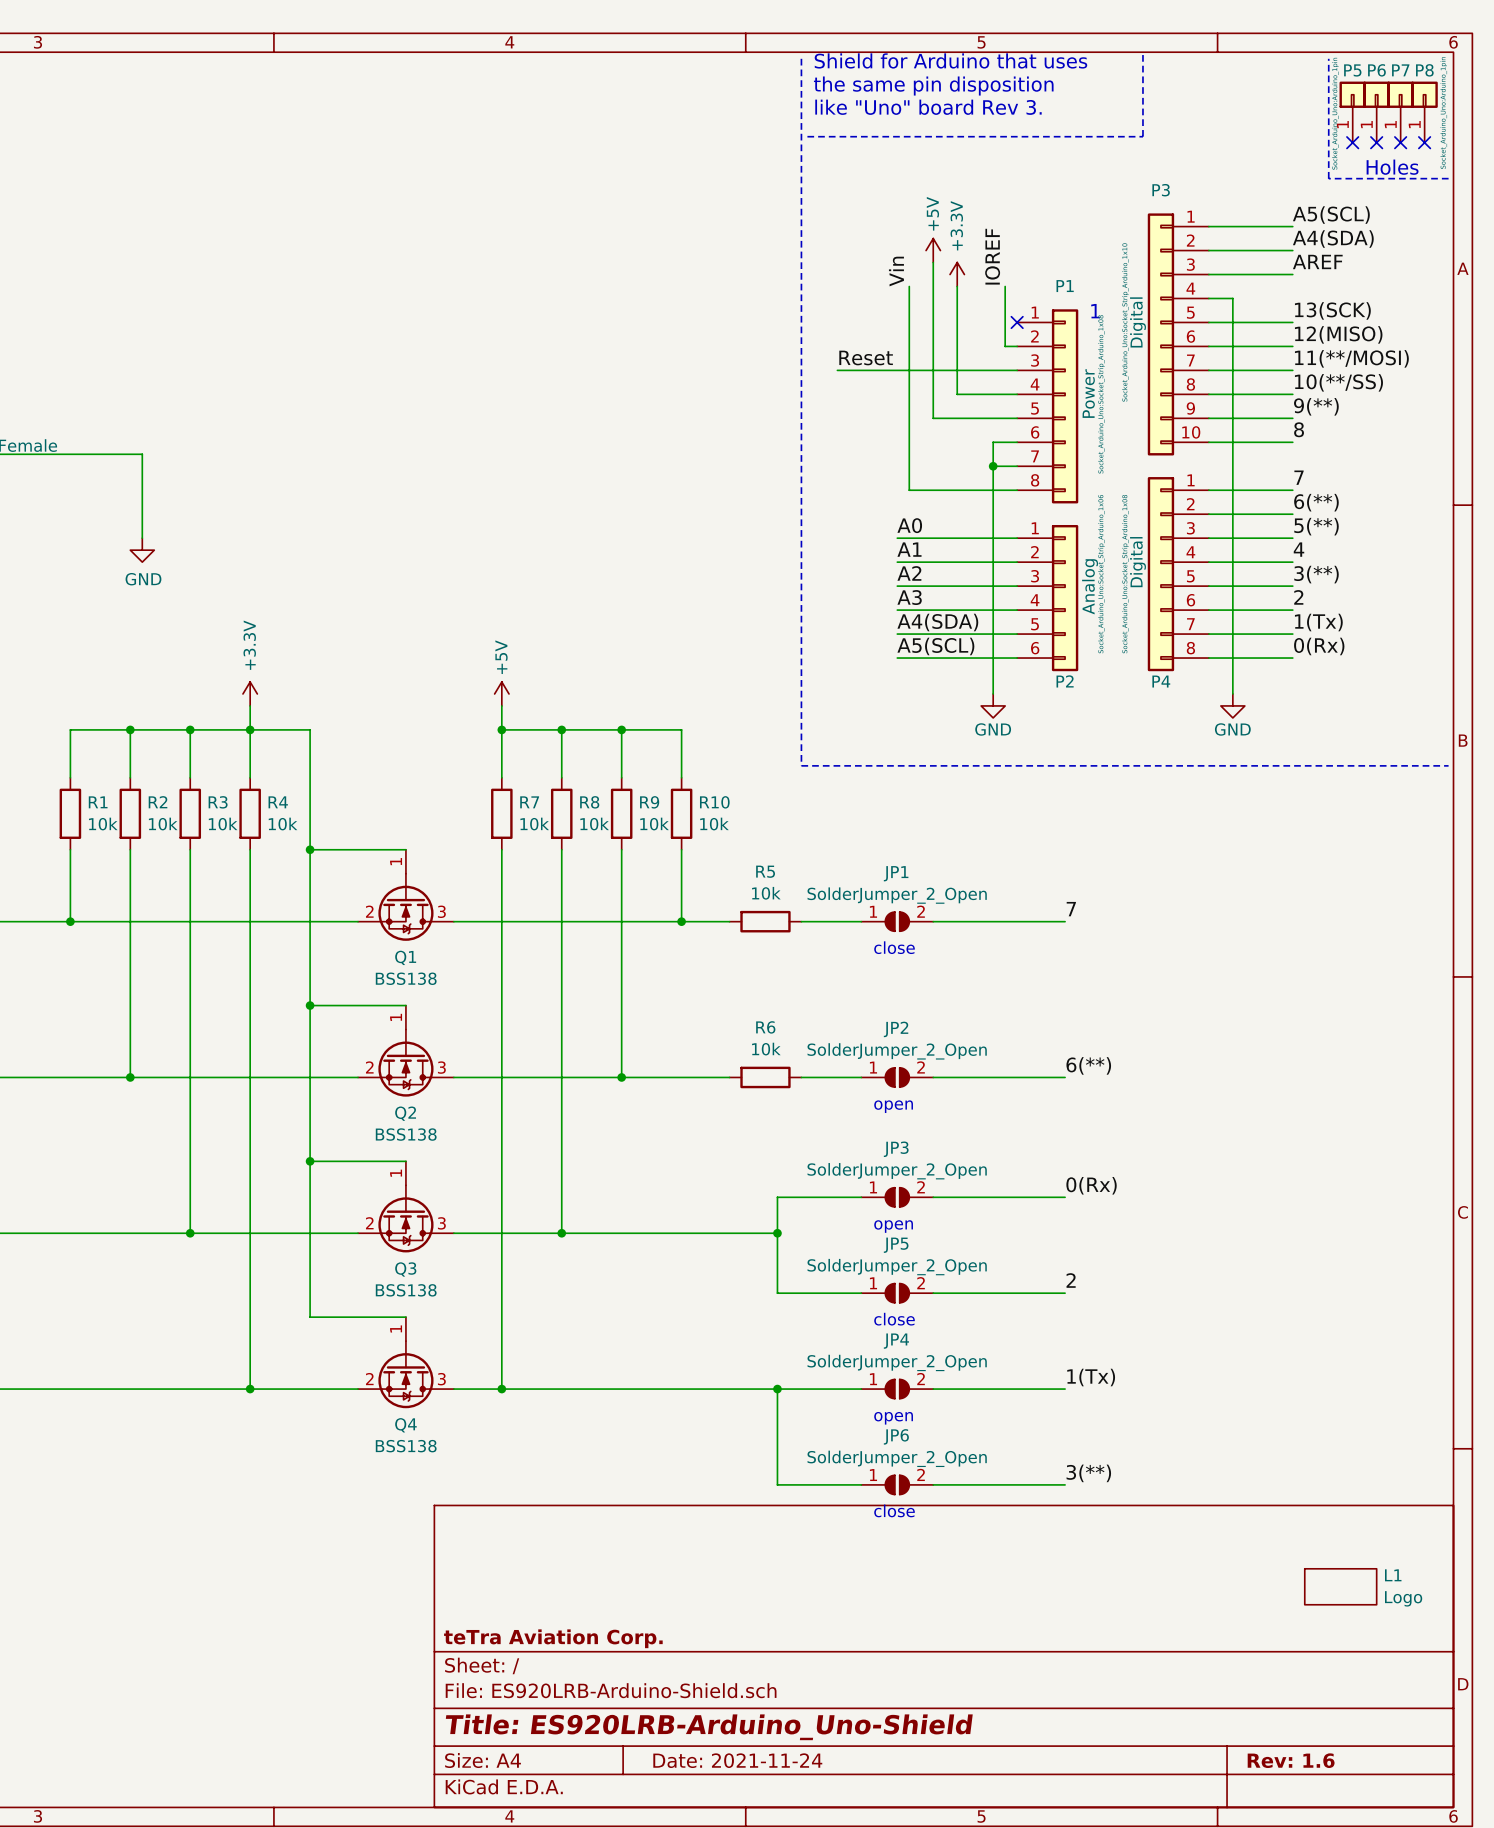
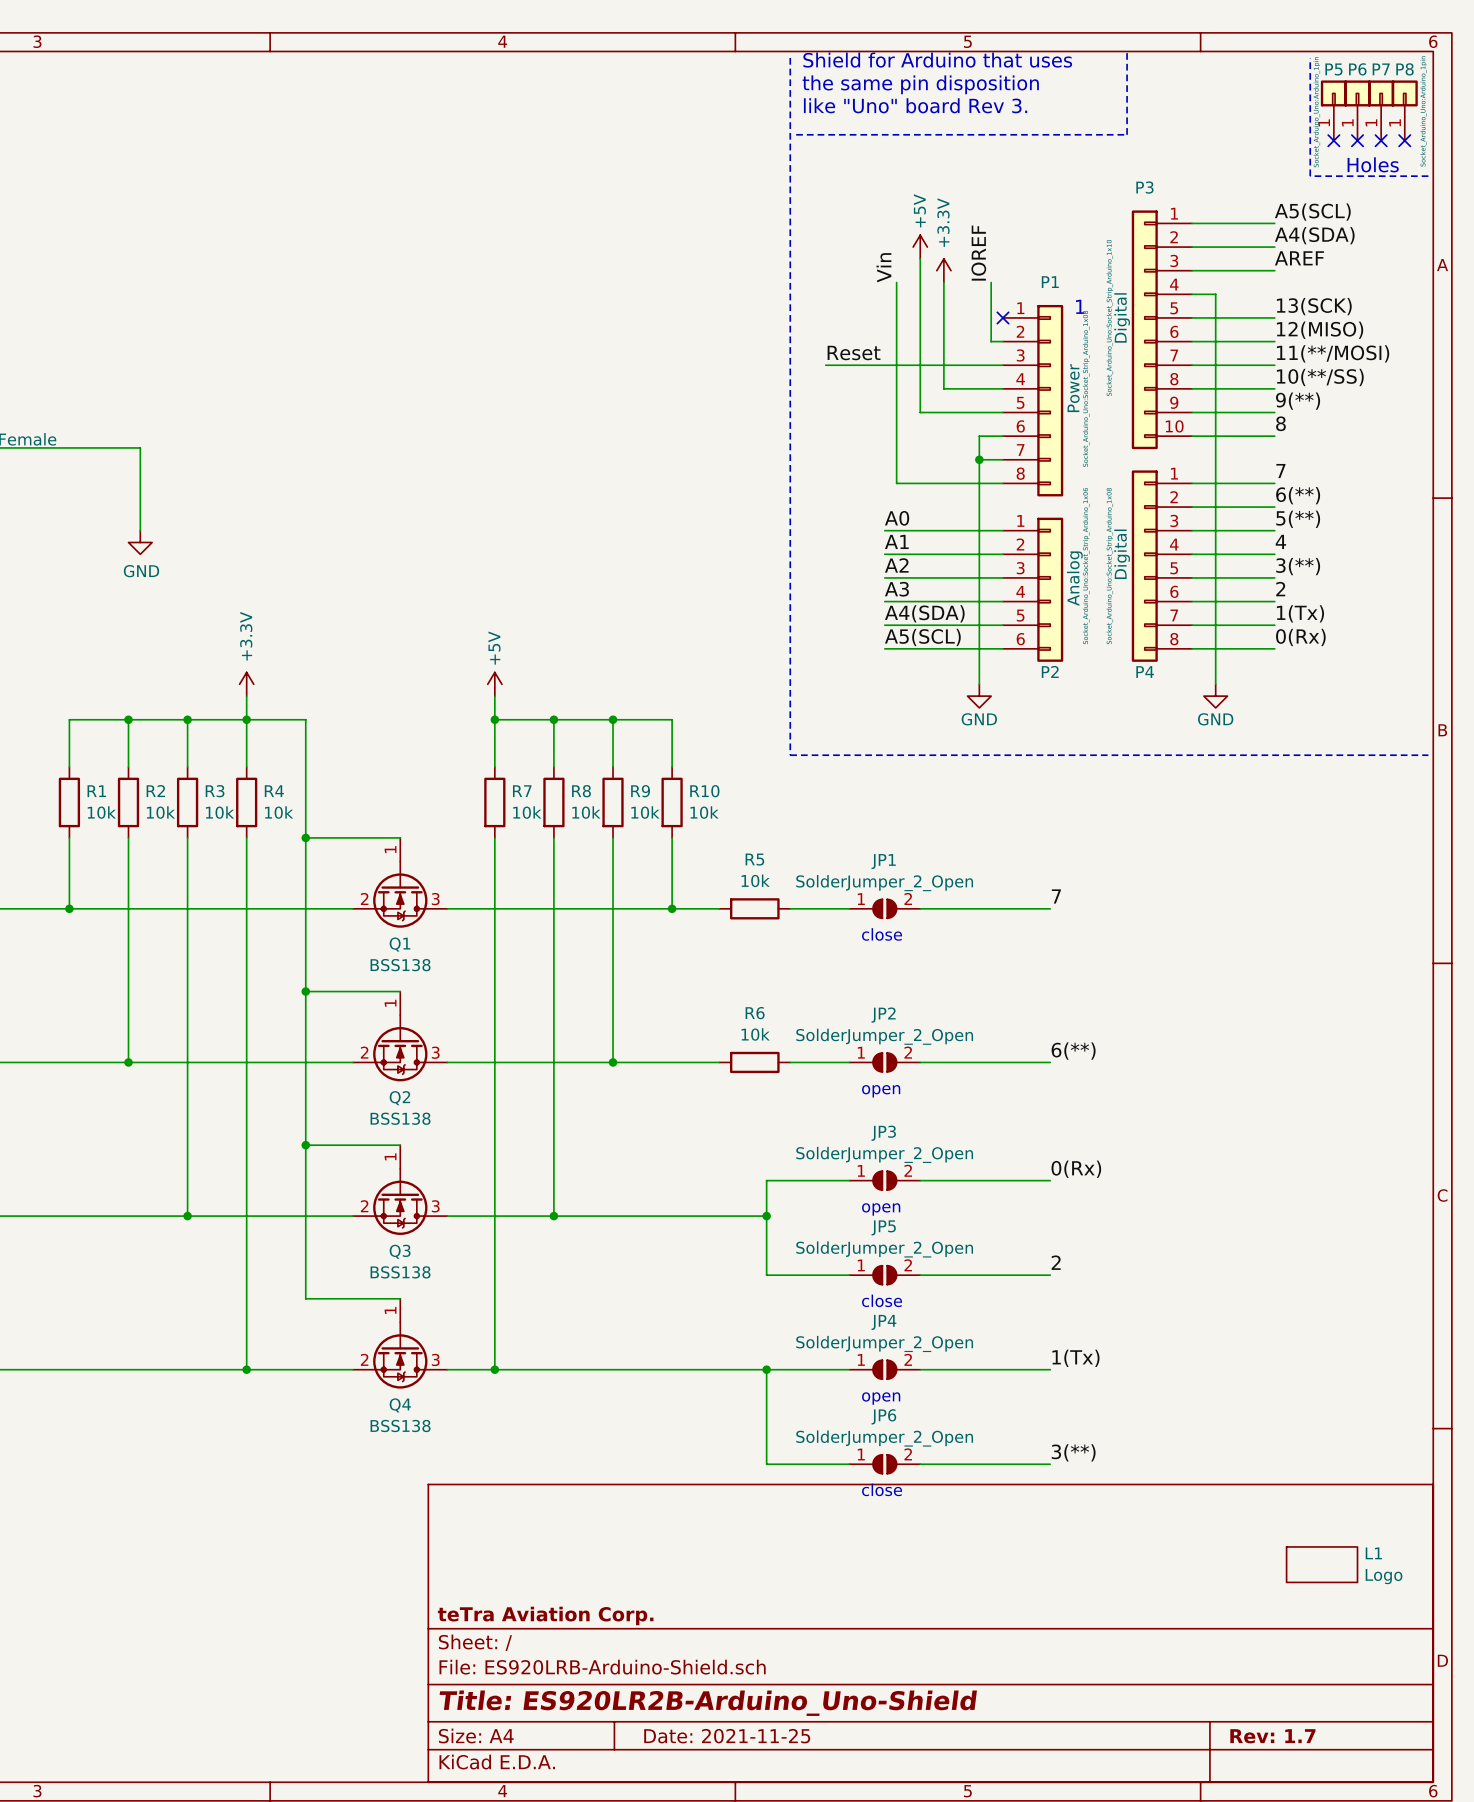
title block: Title: ES920LRB-Arduino_Uno-Shield (709, 1727) -> Title: ES920LR2B-Arduino_Uno-Shield (708, 1703)
title block: Date: 2021-11-24 (737, 1760) -> Date: 2021-11-25 (727, 1736)
title block: Rev: 1.6 (1291, 1760) -> Rev: 1.7 (1272, 1736)

